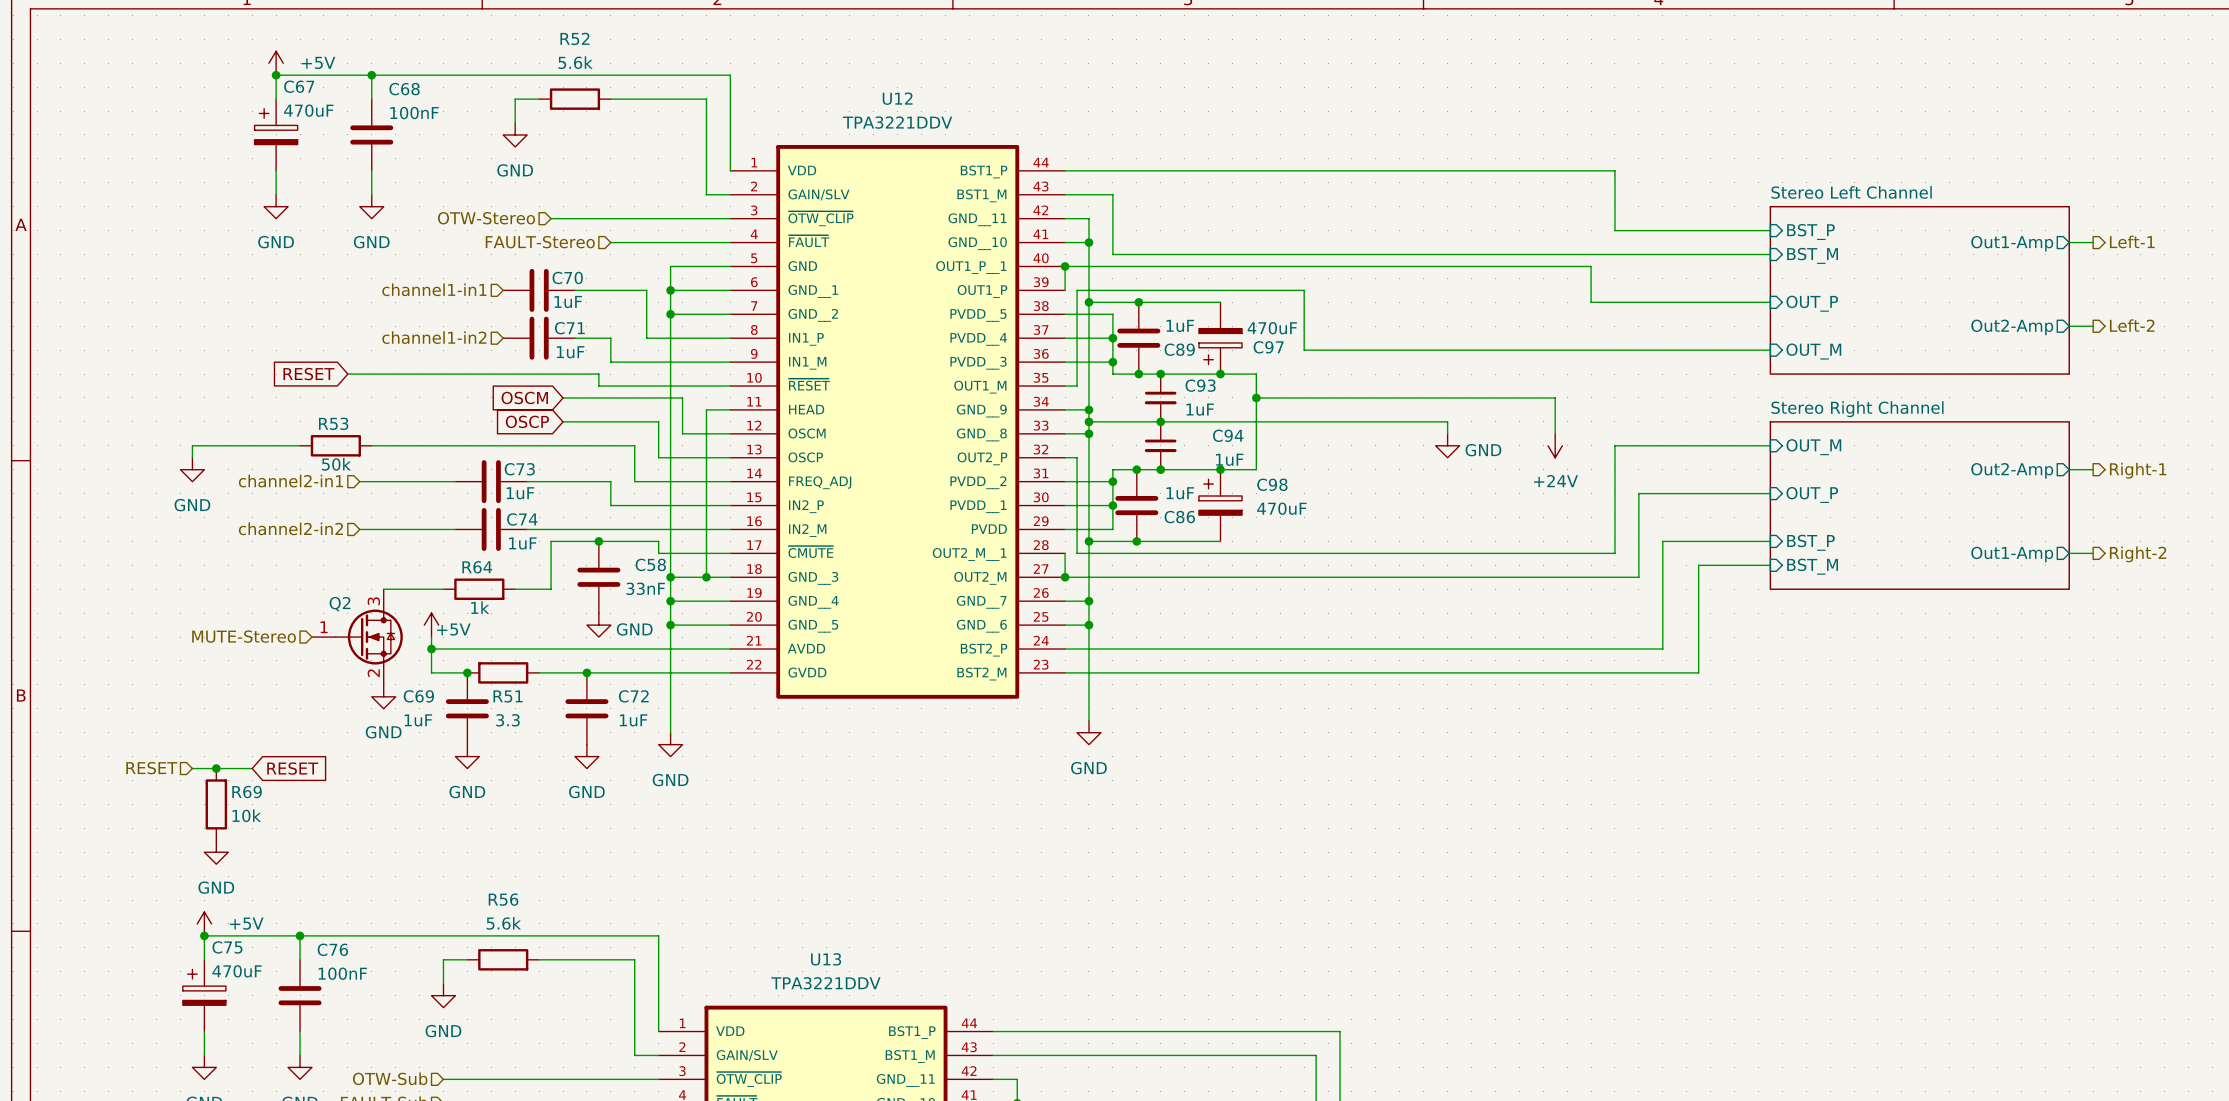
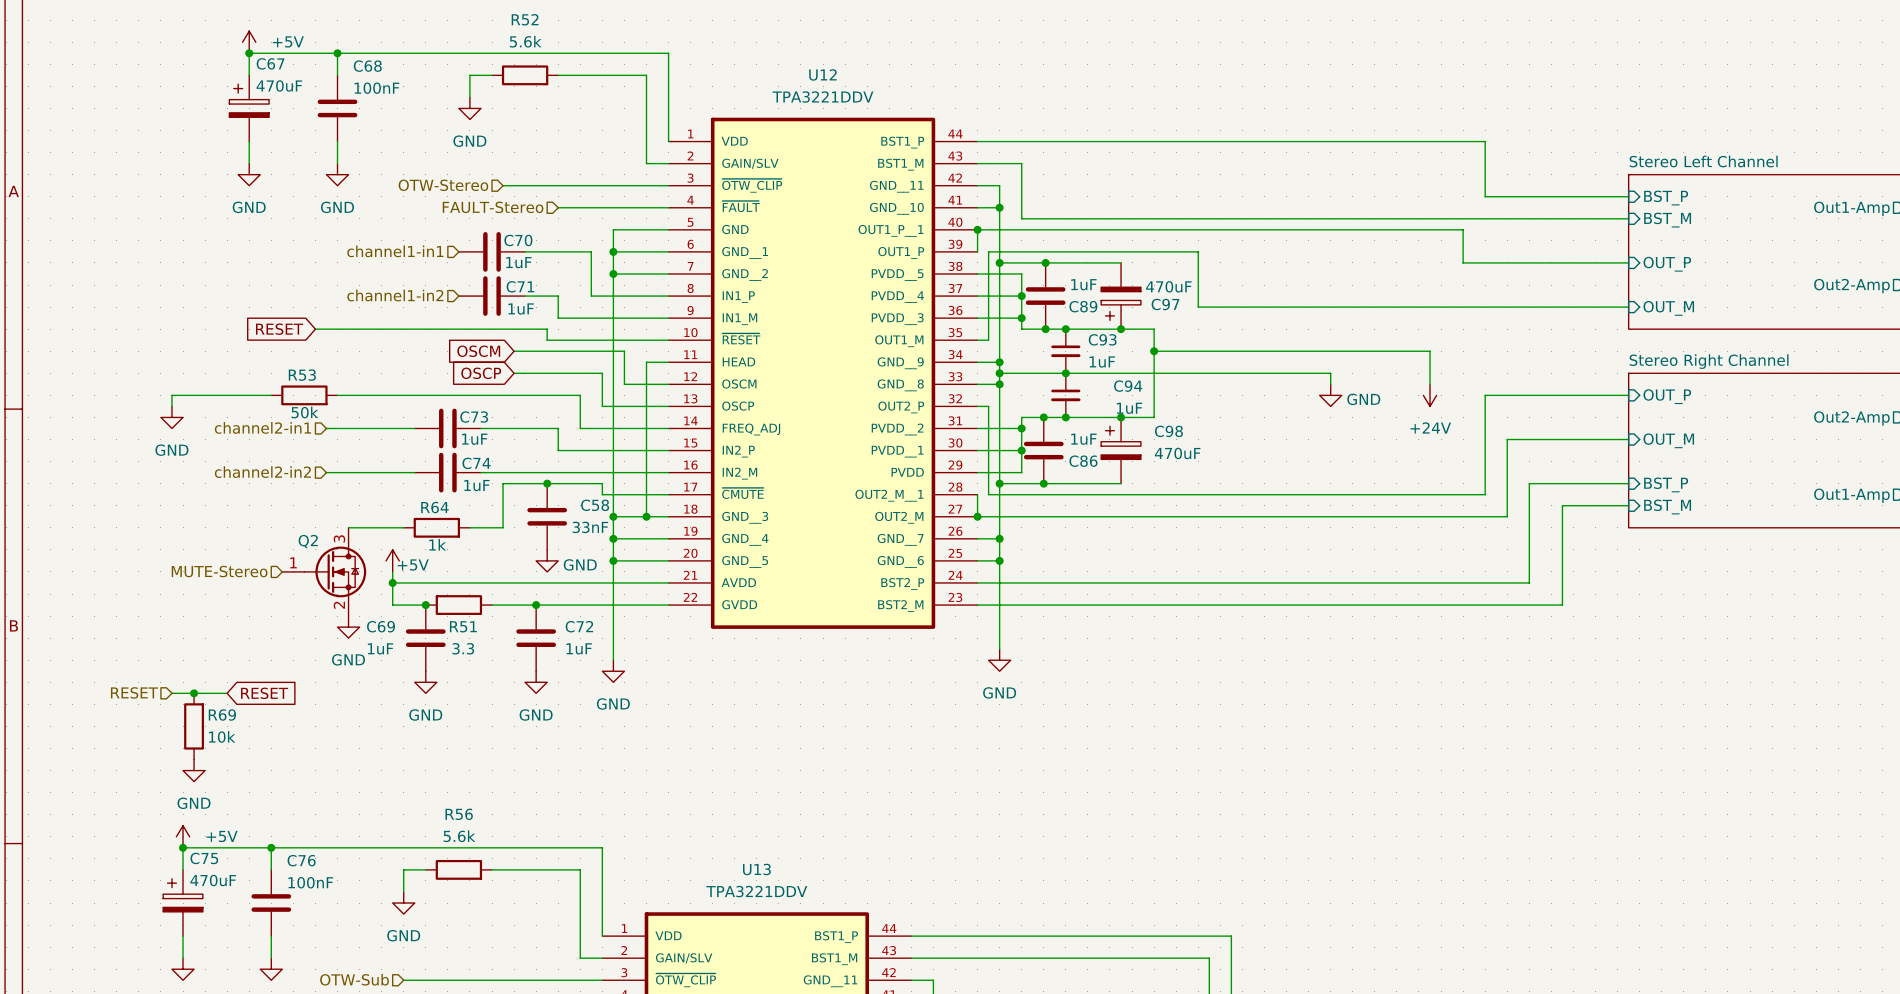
sheet pin: OUT_M (1813, 447) -> OUT_P (1667, 396)
sheet pin: OUT_P (1812, 494) -> OUT_M (1668, 440)

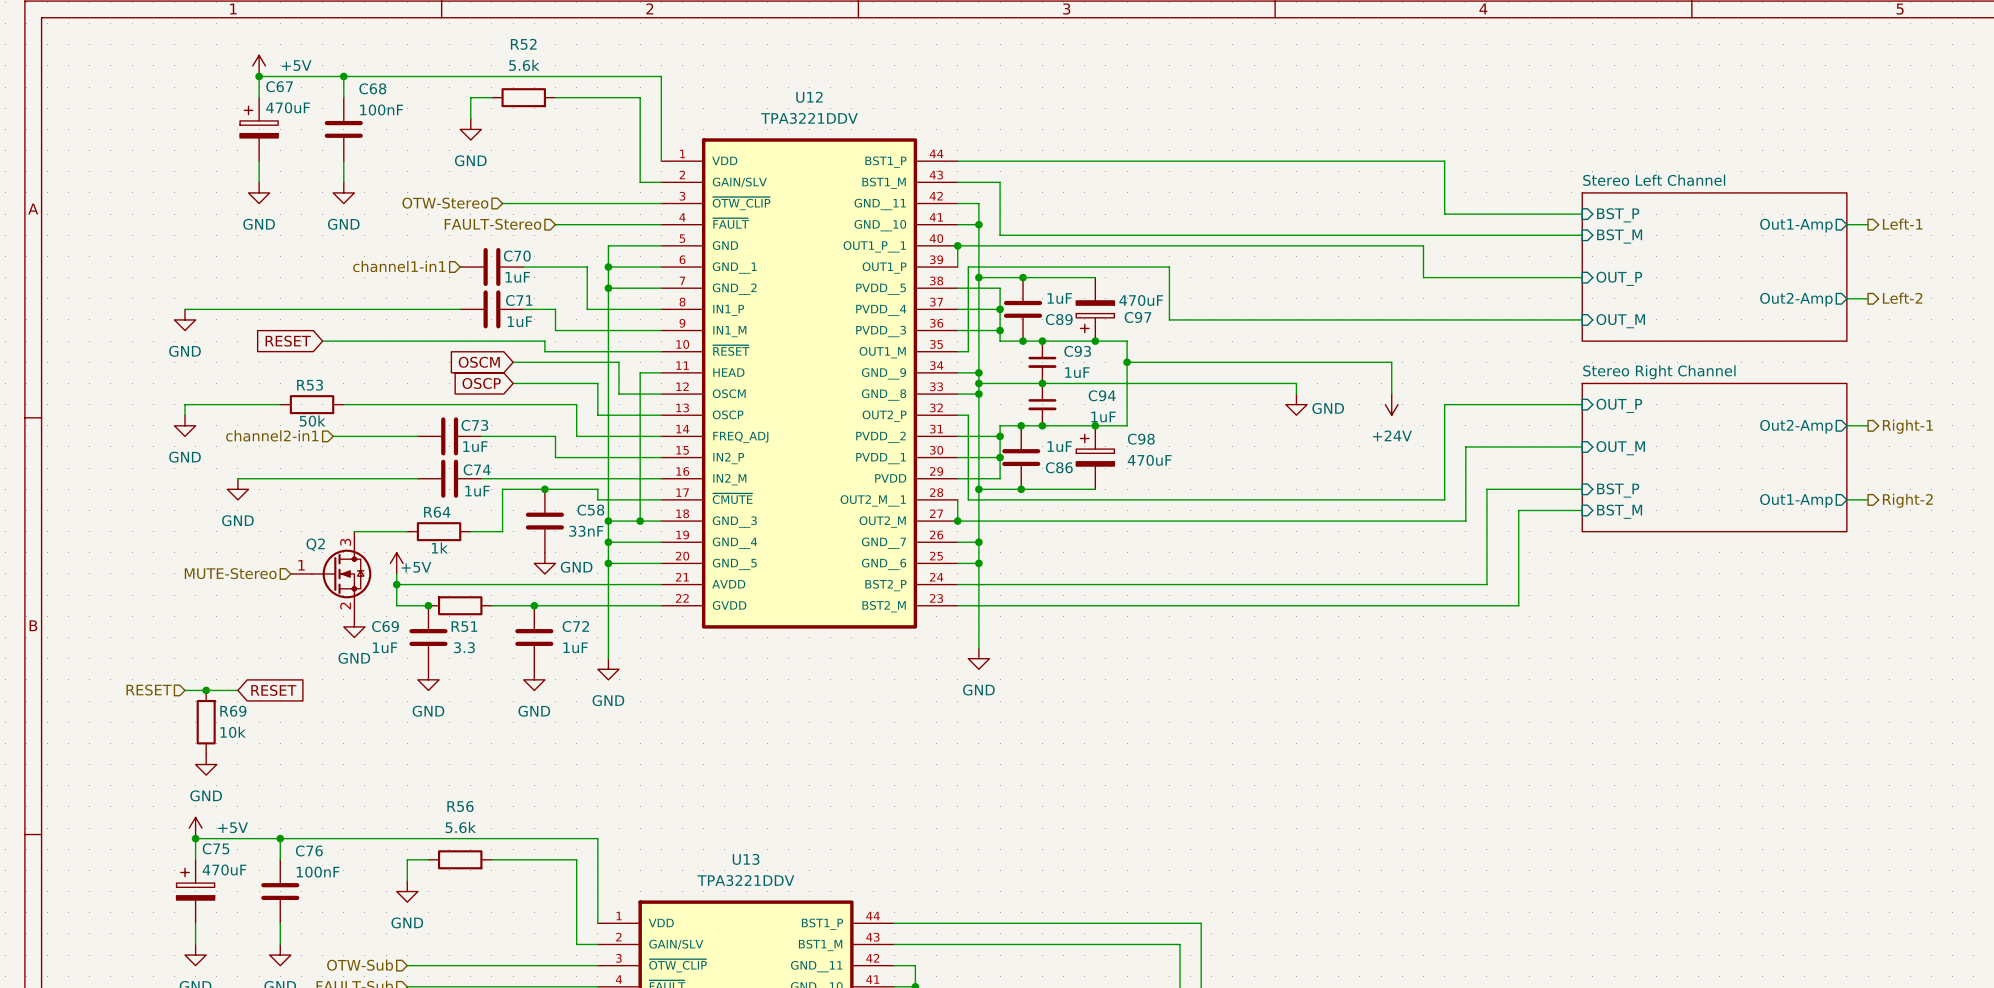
hierarchical label: channel1-in2 (395, 295) -> none
wire: none -> (185, 309) (460, 309)
power symbol: none -> GND (185, 319)
wire: none -> (237, 478) (333, 478)
hierarchical label: channel2-in2 (262, 472) -> none
power symbol: none -> GND (237, 489)

